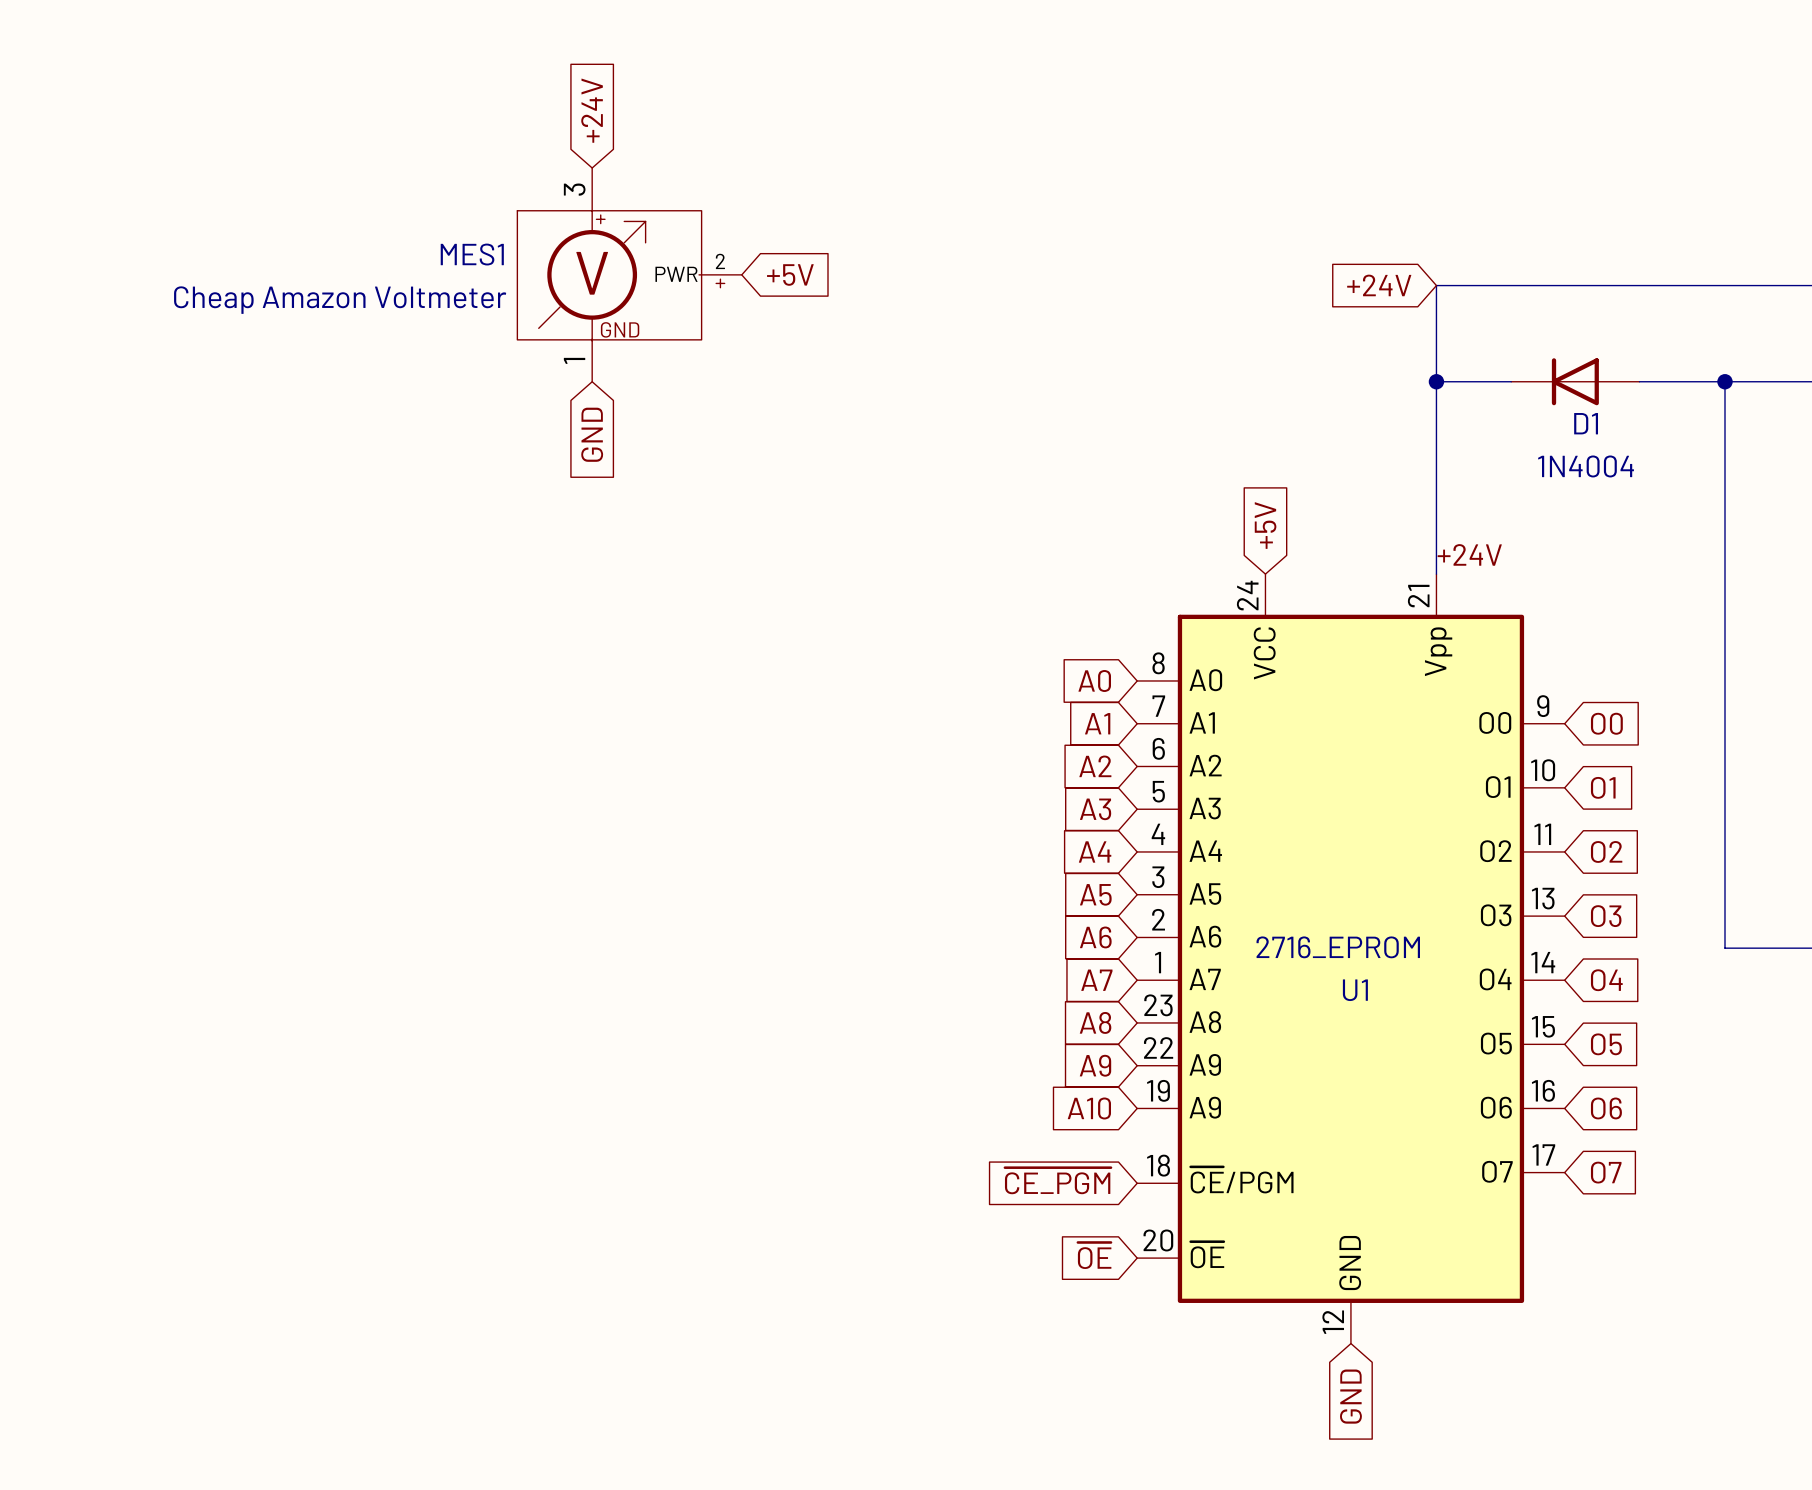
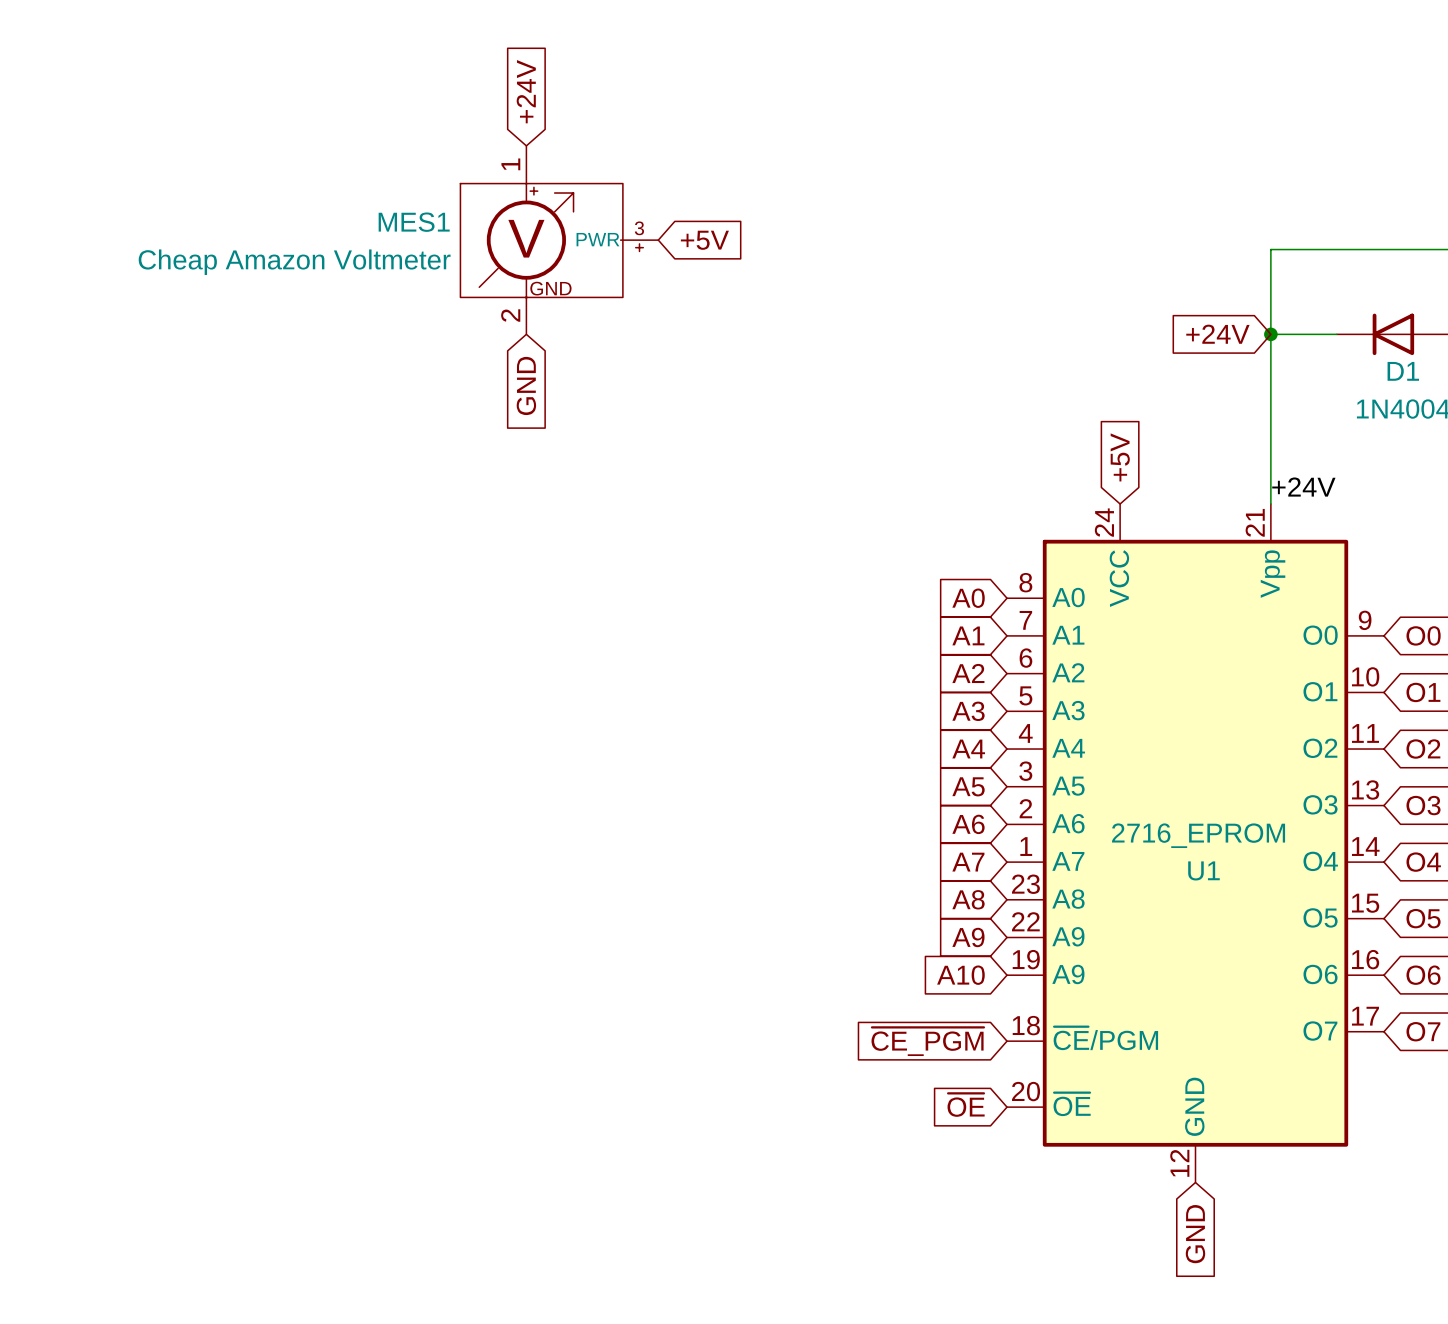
MES1 pin number: 3 (574, 189) -> 1 (510, 164)
MES1 pin number: 2 (720, 261) -> 3 (639, 228)
global label position: +24V (1379, 285) -> +24V (1217, 334)
MES1 pin number: 1 (574, 360) -> 2 (510, 315)

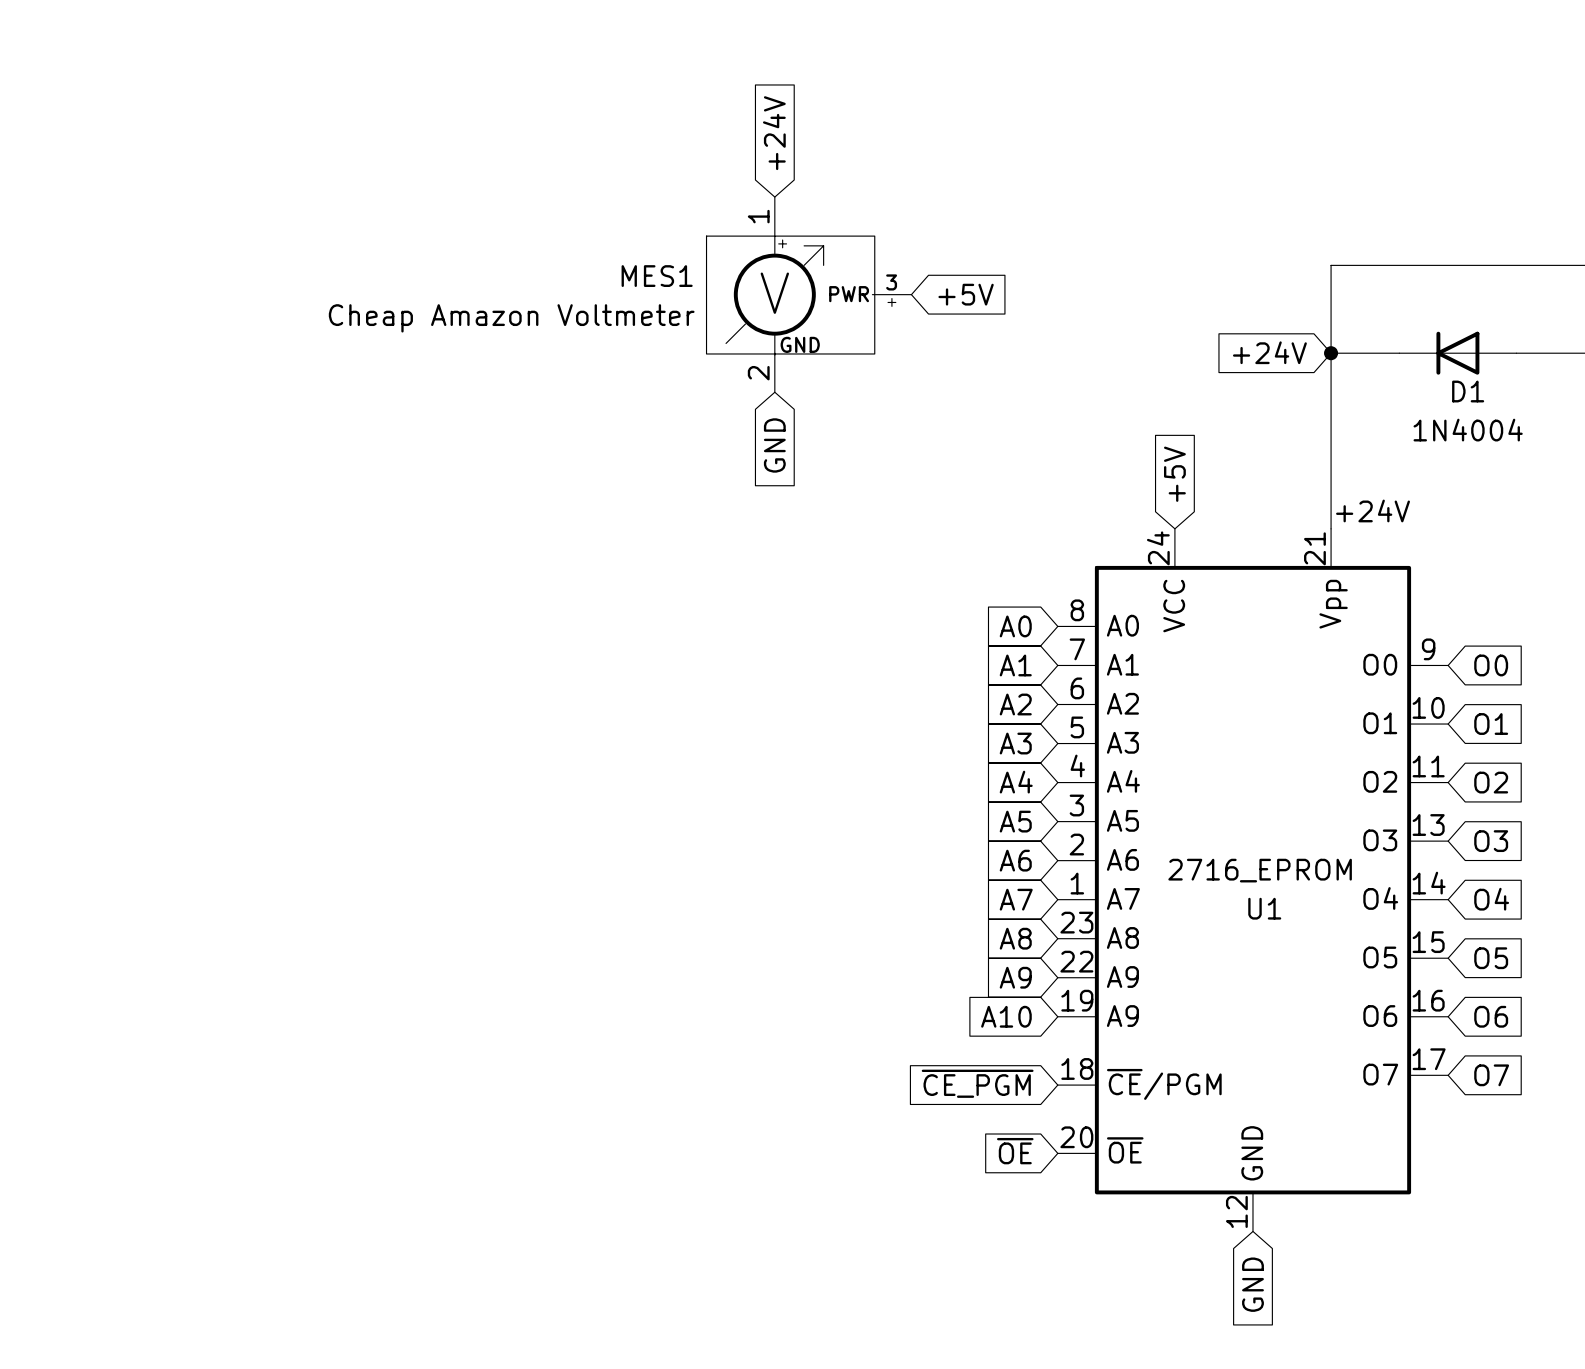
global label position: +24V (526, 91) -> +24V (774, 133)
MES1 position: (559, 240) -> (808, 294)
global label position: +5V (704, 240) -> +5V (966, 294)
global label position: GND (526, 385) -> GND (774, 445)

